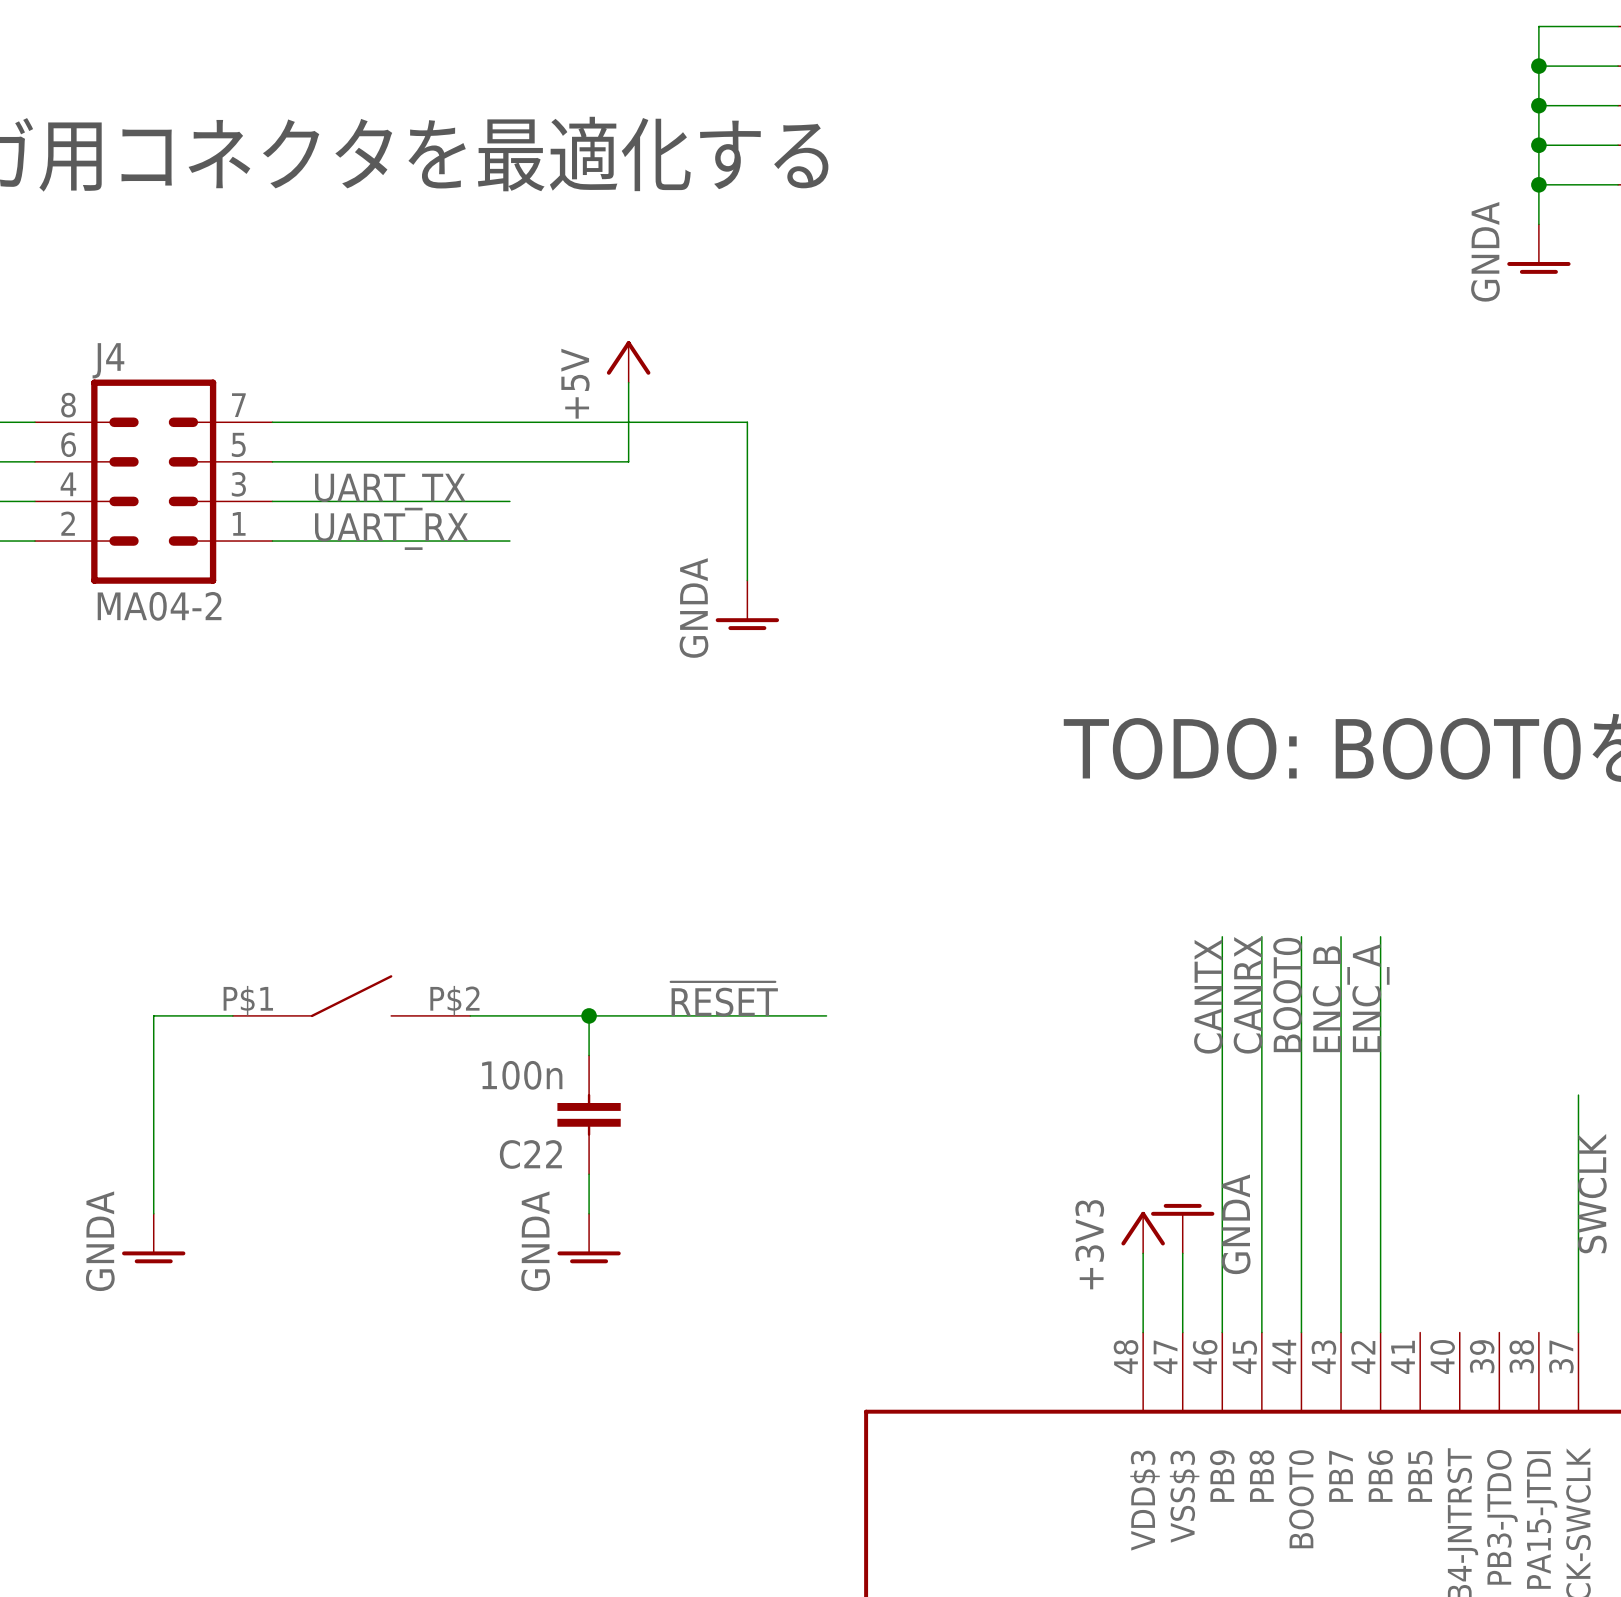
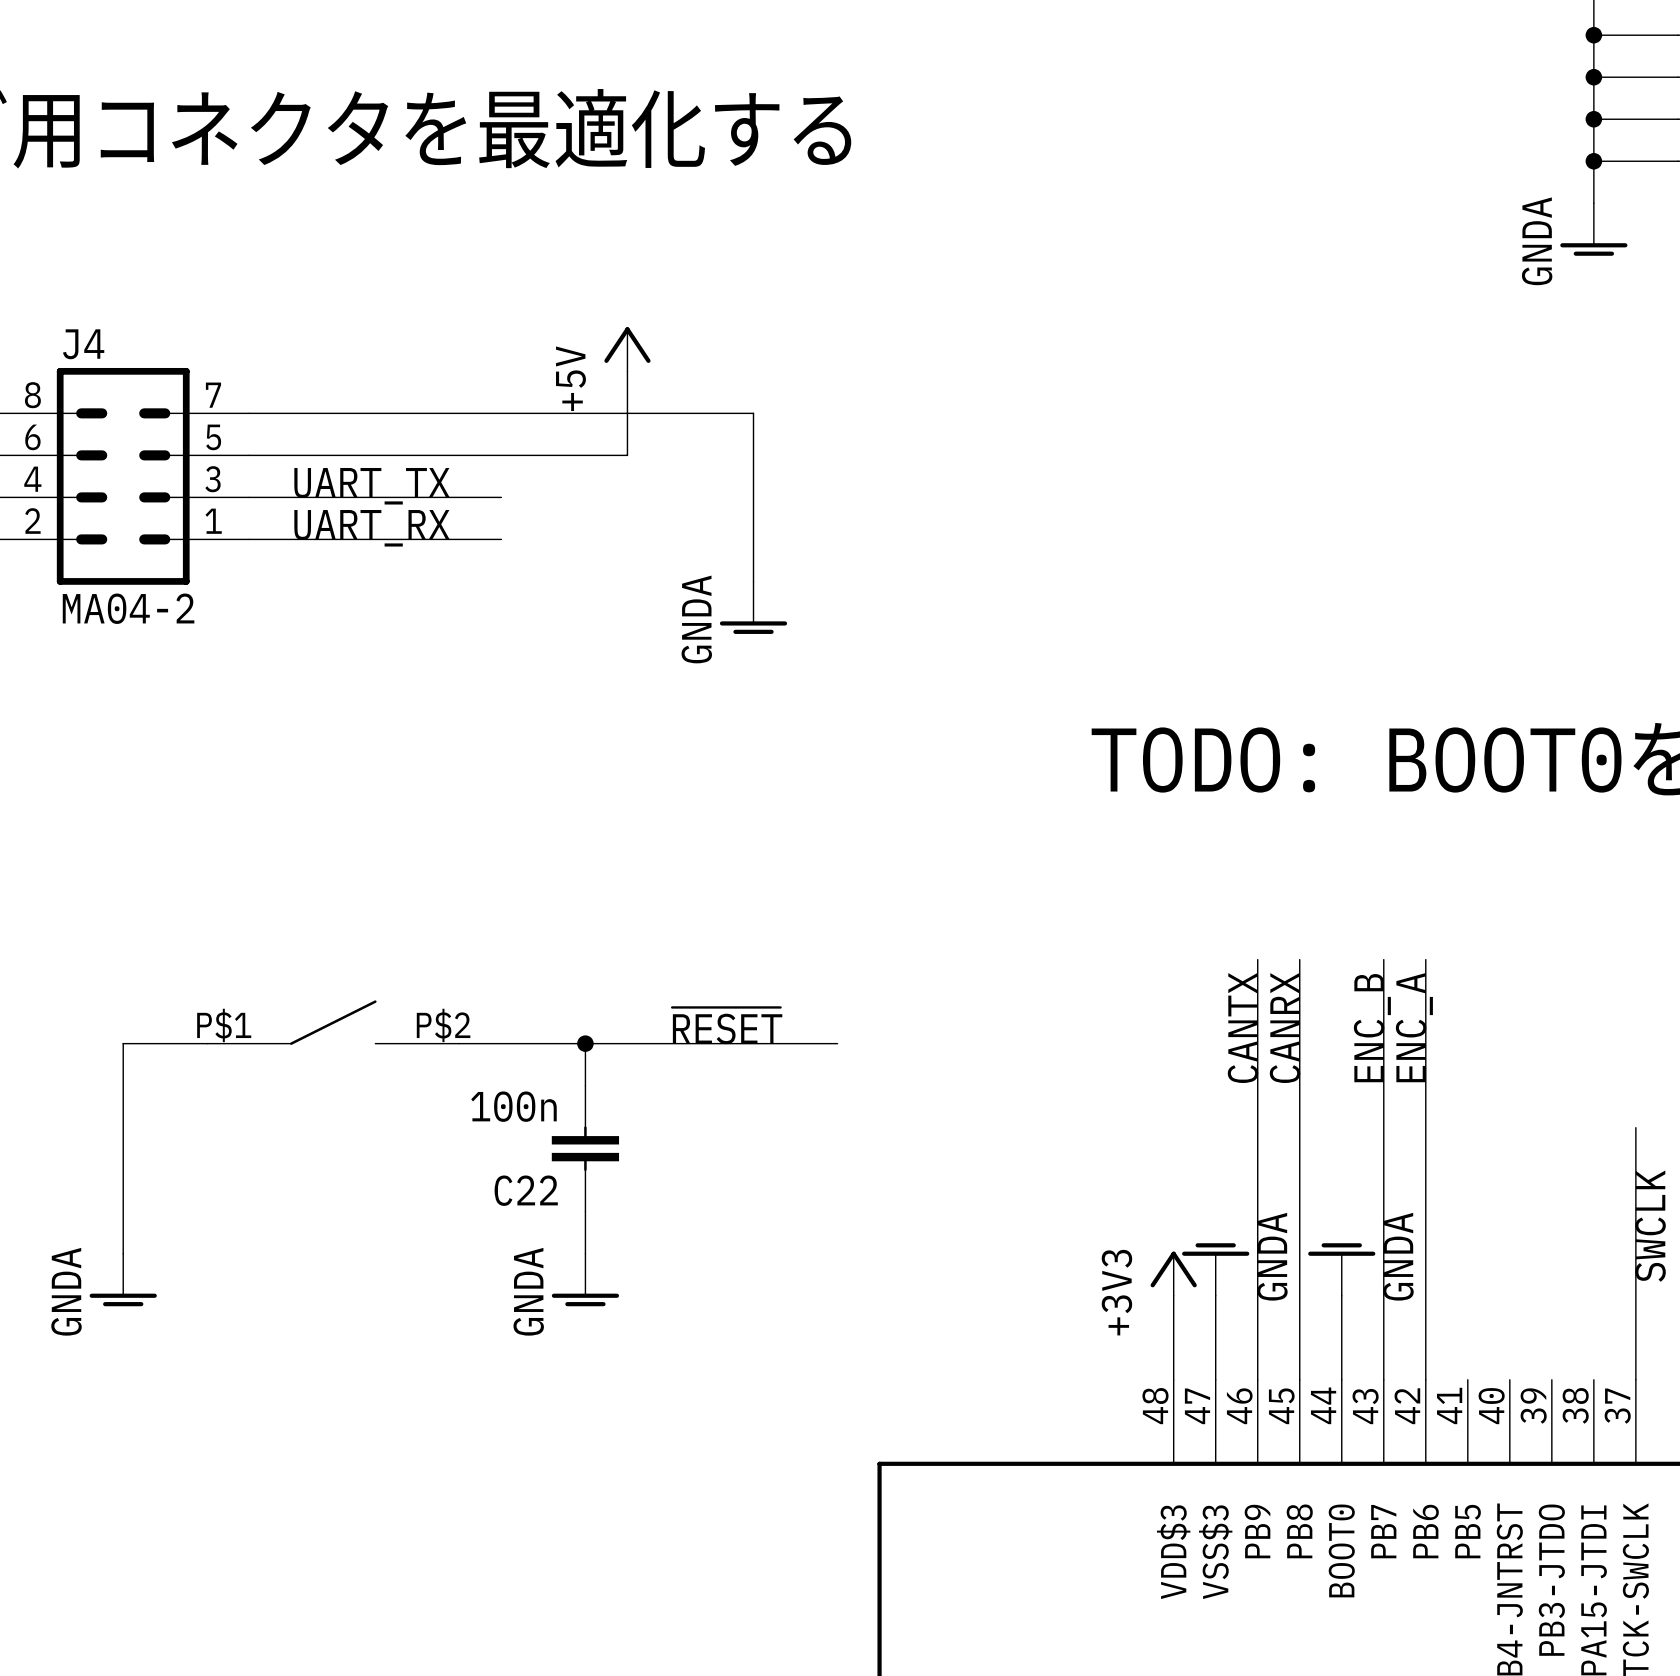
wire: (1301, 936) (1301, 1253) -> none
label: BOOT0 (1287, 994) -> none
power symbol: none -> GNDA (1341, 1269)

